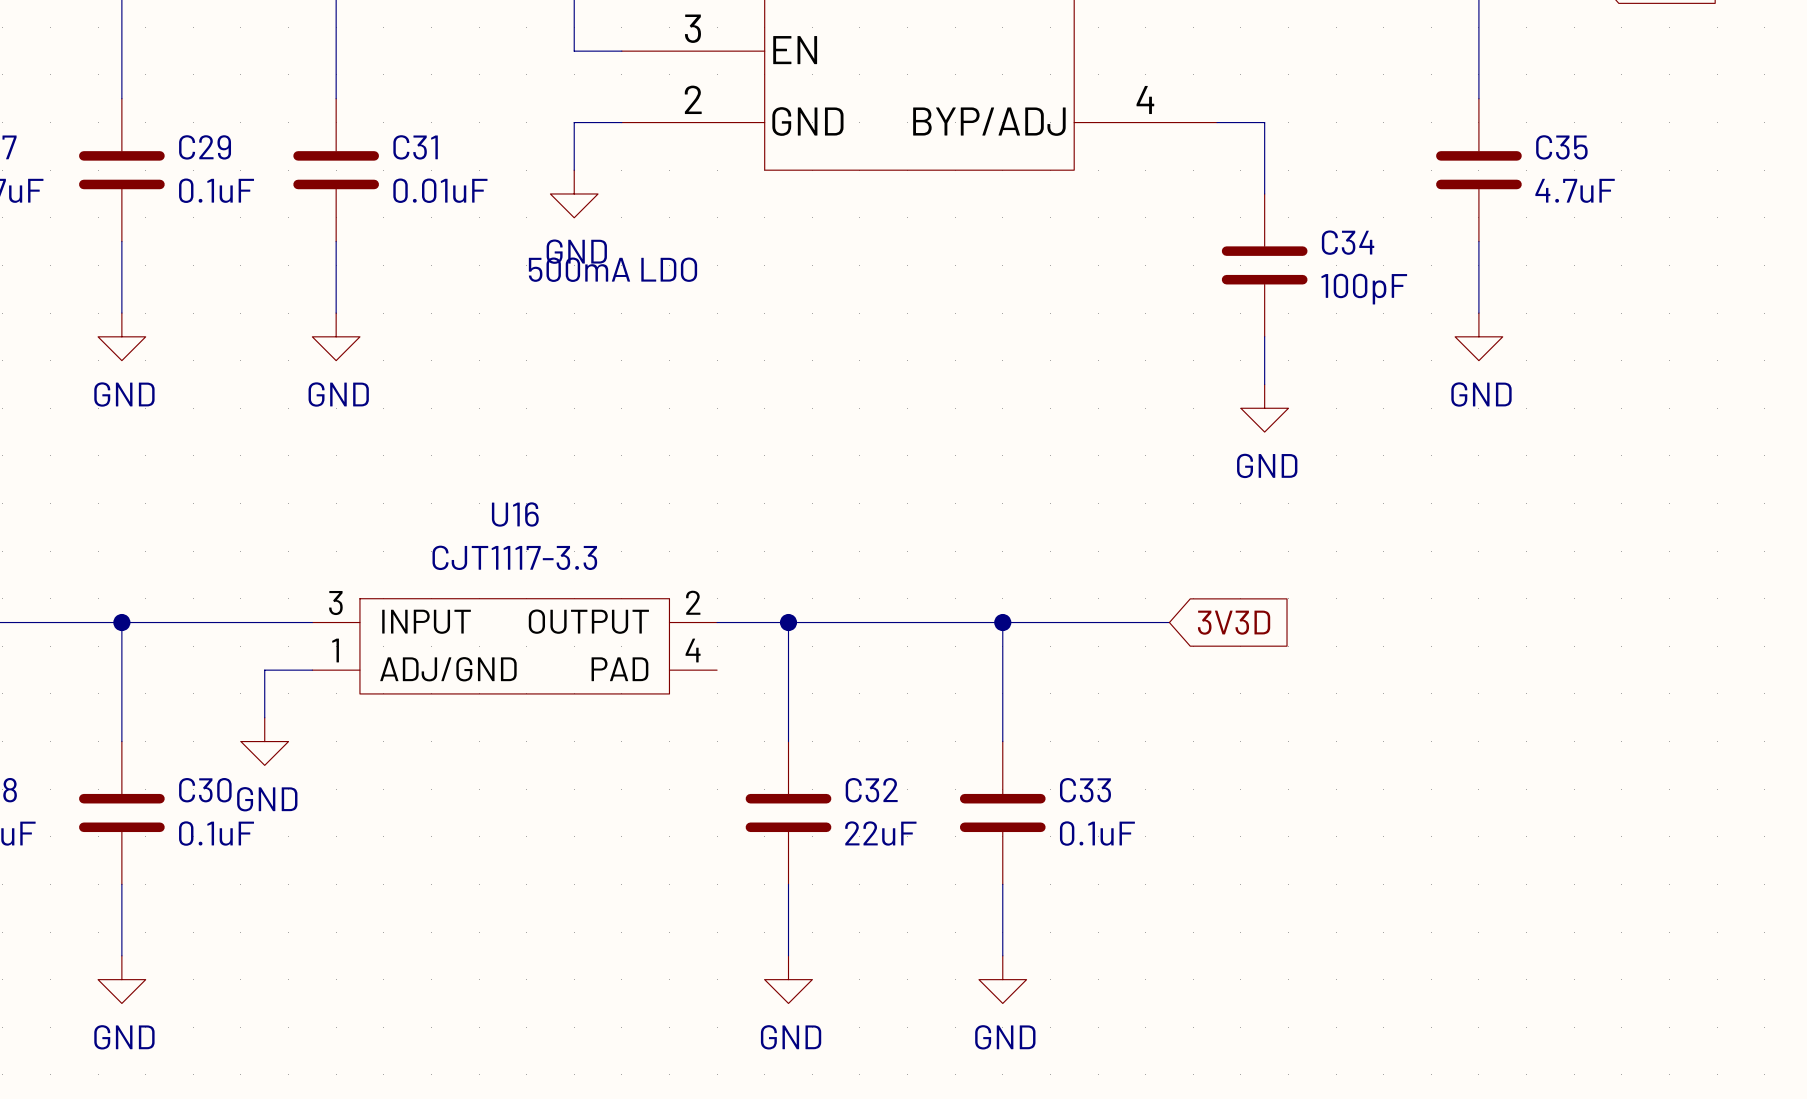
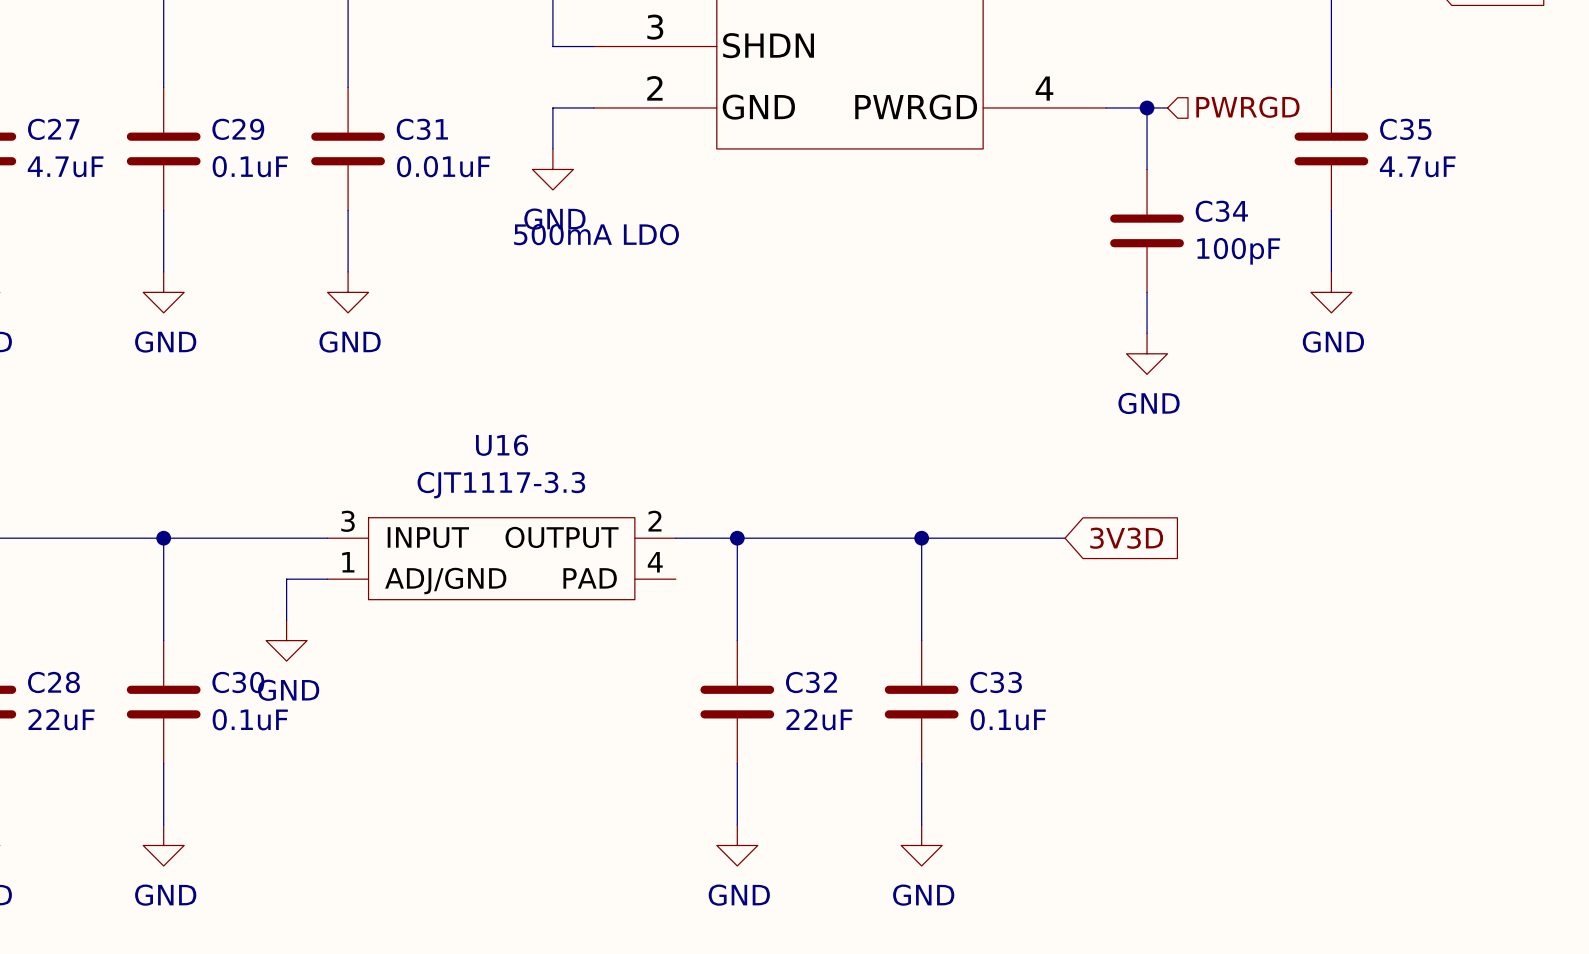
part pin name: EN (795, 50) -> SHDN (768, 45)
part pin name: BYP/ADJ (989, 121) -> PWRGD (916, 107)
hierarchical label: none -> PWRGD (1247, 107)
wire: none -> (1147, 107) (1167, 107)
junction: none -> (1147, 107)

